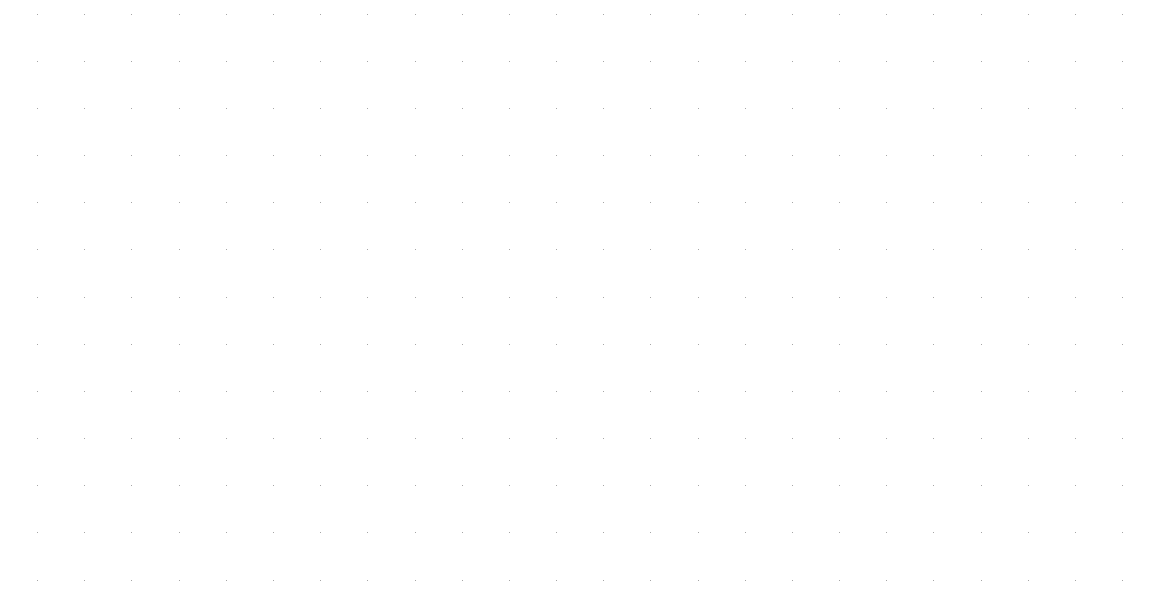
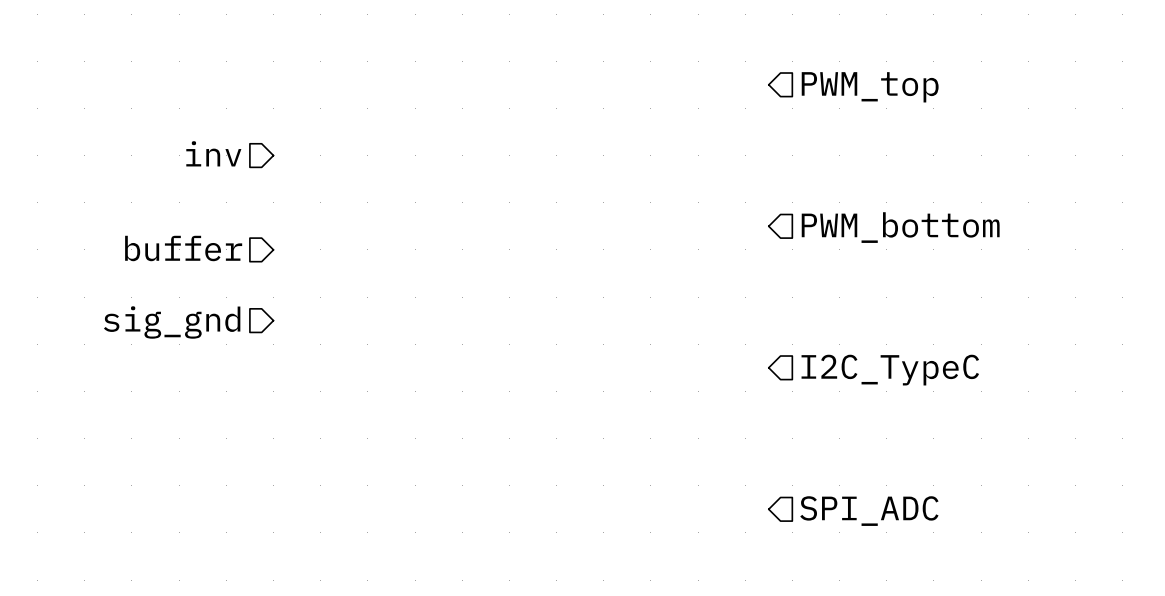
hierarchical label: none -> PWM_top (870, 87)
hierarchical label: none -> inv (213, 153)
hierarchical label: none -> PWM_bottom (900, 227)
hierarchical label: none -> buffer (183, 248)
hierarchical label: none -> sig_gnd (172, 322)
hierarchical label: none -> I2C_TypeC (890, 370)
hierarchical label: none -> SPI_ADC (869, 511)

